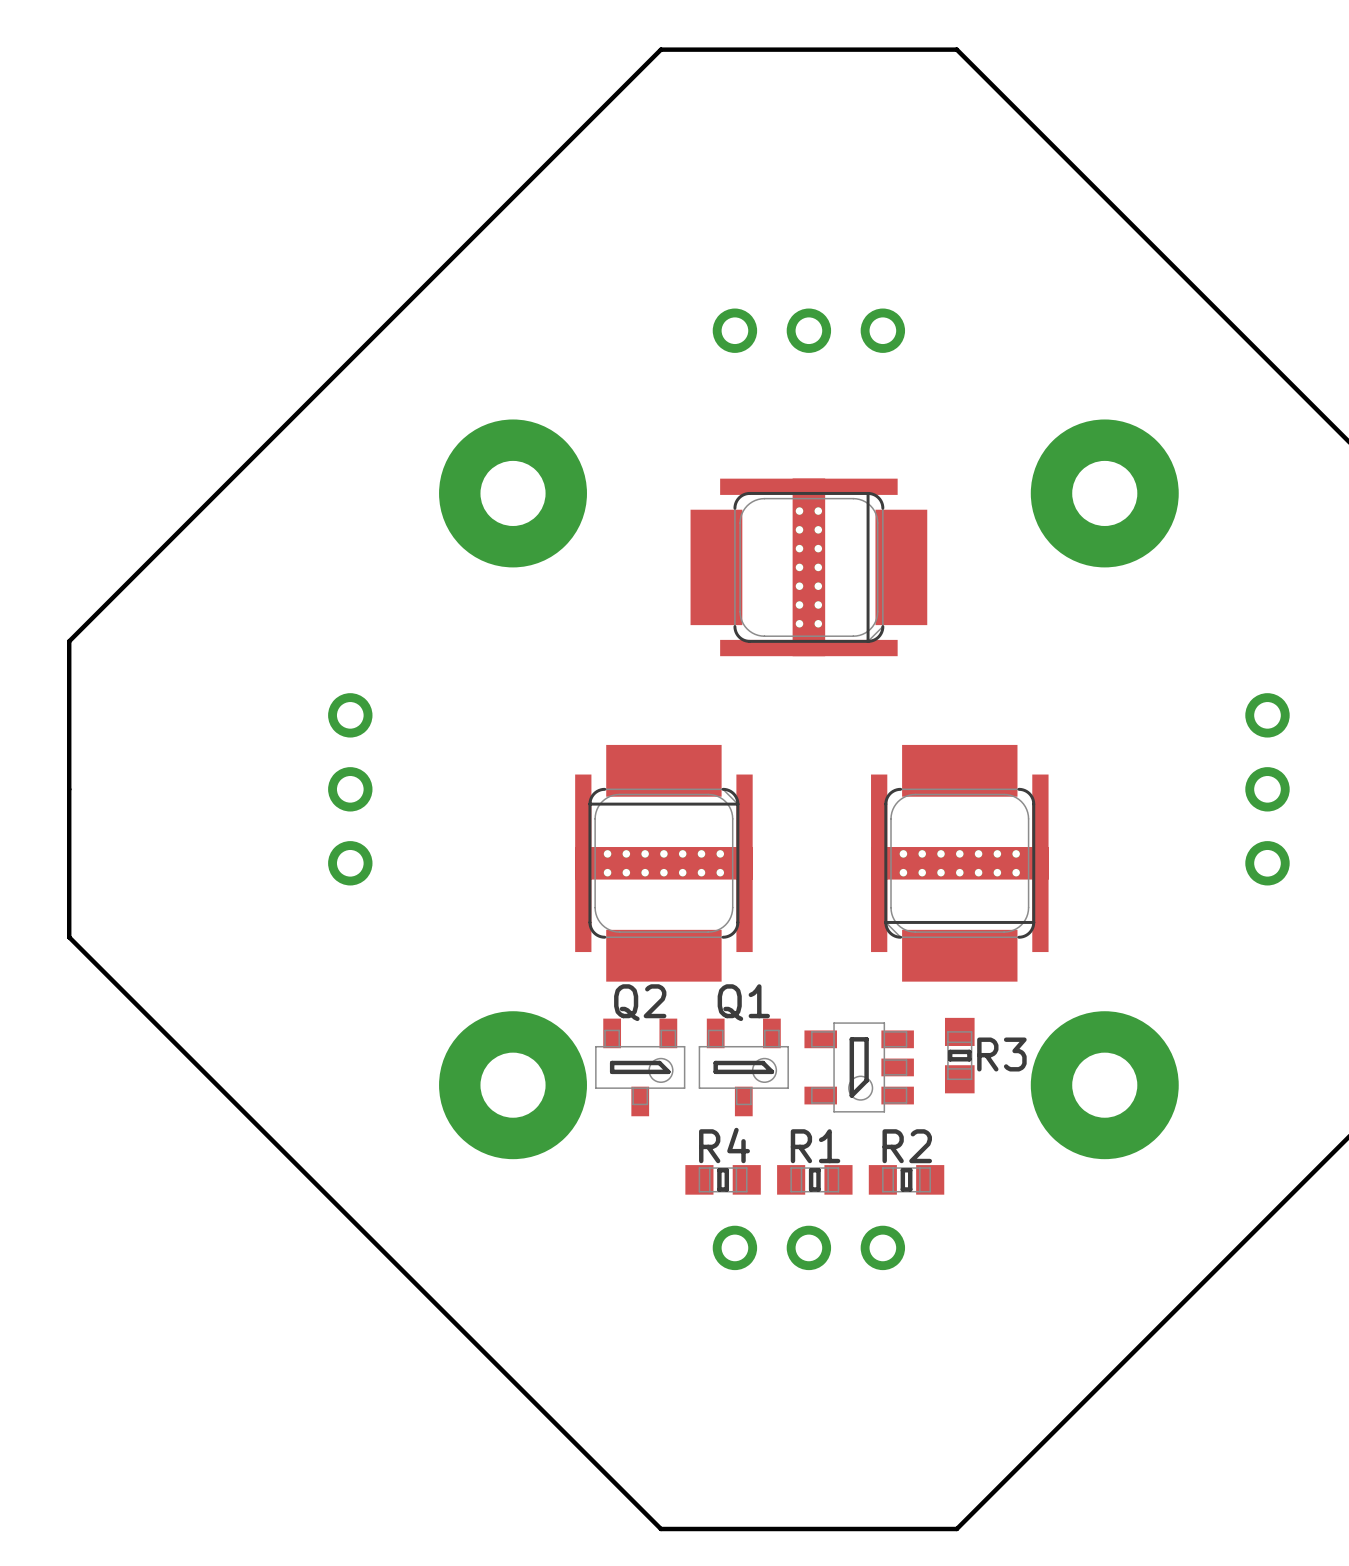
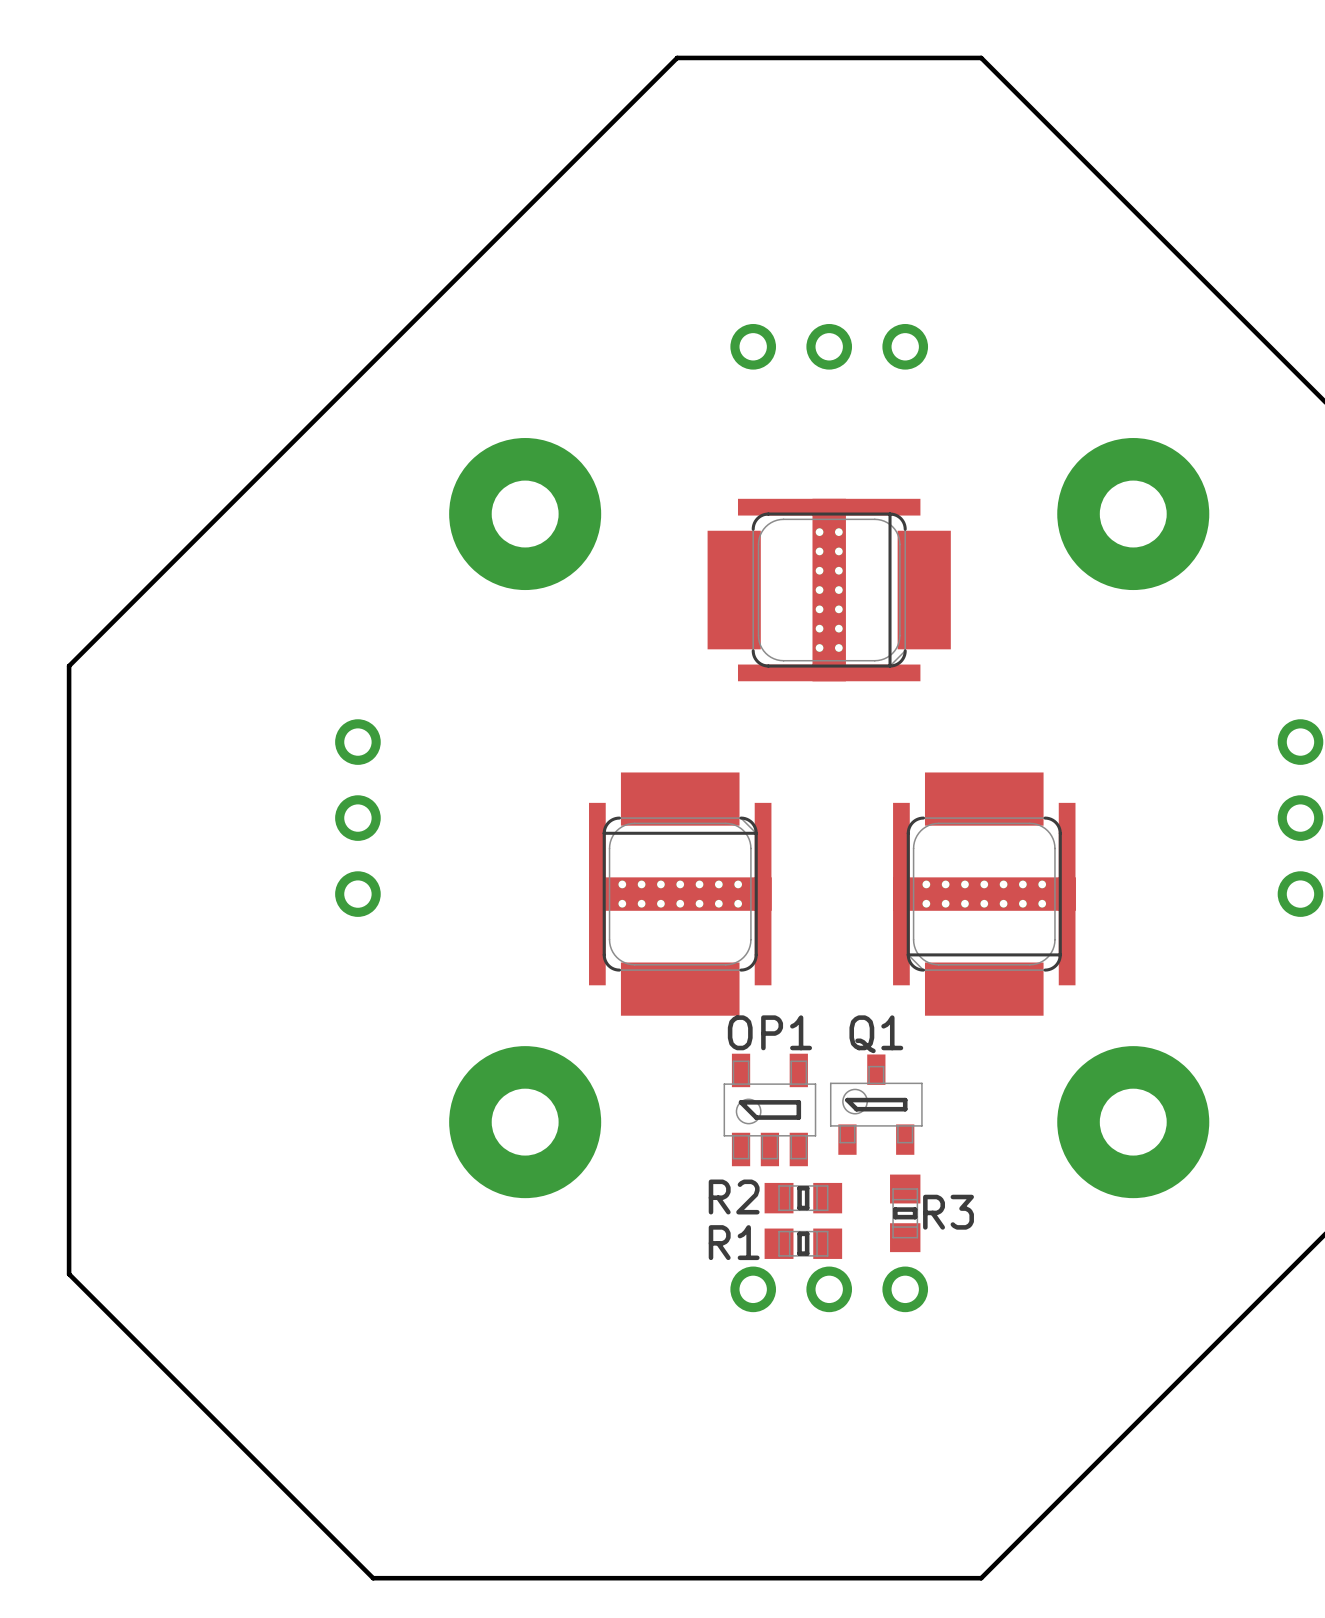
board edge: (69, 937) (660, 1529) -> (69, 970) (69, 1274) (373, 1578) (677, 1578)
R3 position: (959, 1055) -> (905, 1213)
Q2: (640, 1067) -> none
Q1 rotation: 0° (743, 1067) -> 180° (876, 1104)
Q1 position: (743, 1067) -> (876, 1104)
part: (859, 1067) -> none
OP1: none -> (769, 1109)
R1 name position: R1 (815, 1146) -> R1 (734, 1242)
R2 name position: R2 (907, 1146) -> R2 (734, 1197)
R4: (723, 1179) -> none
R1 position: (814, 1179) -> (803, 1243)
R2 position: (906, 1179) -> (803, 1198)

